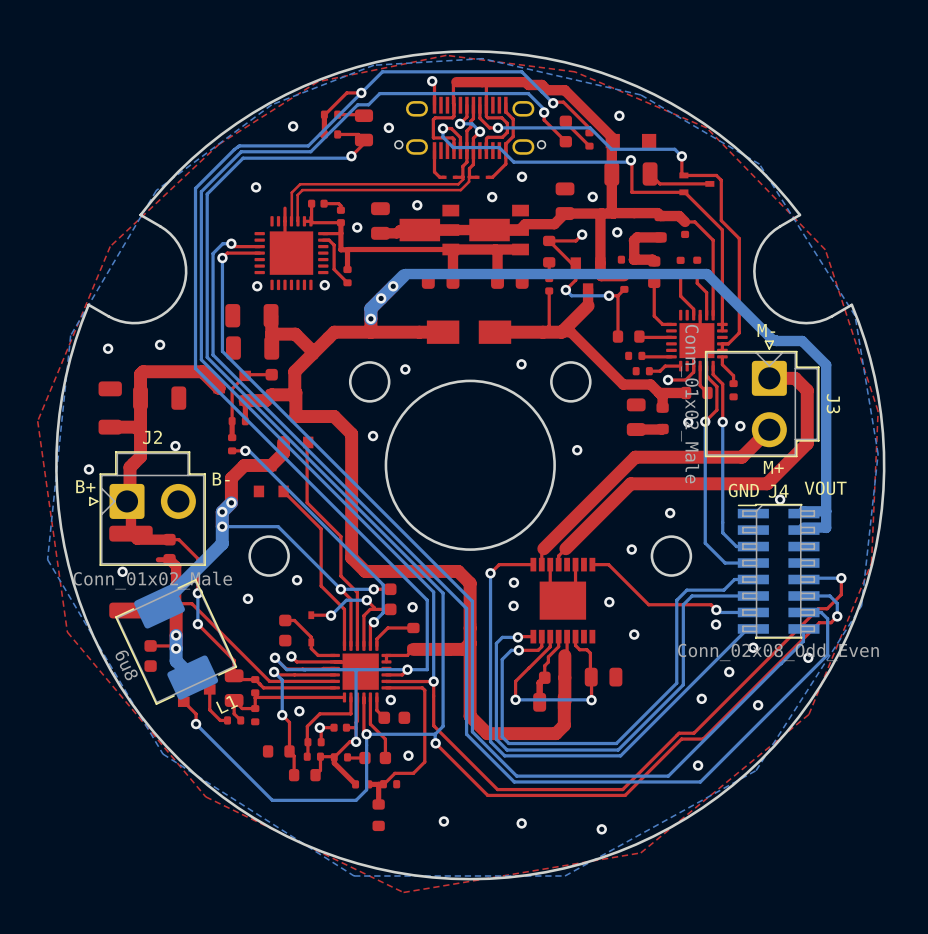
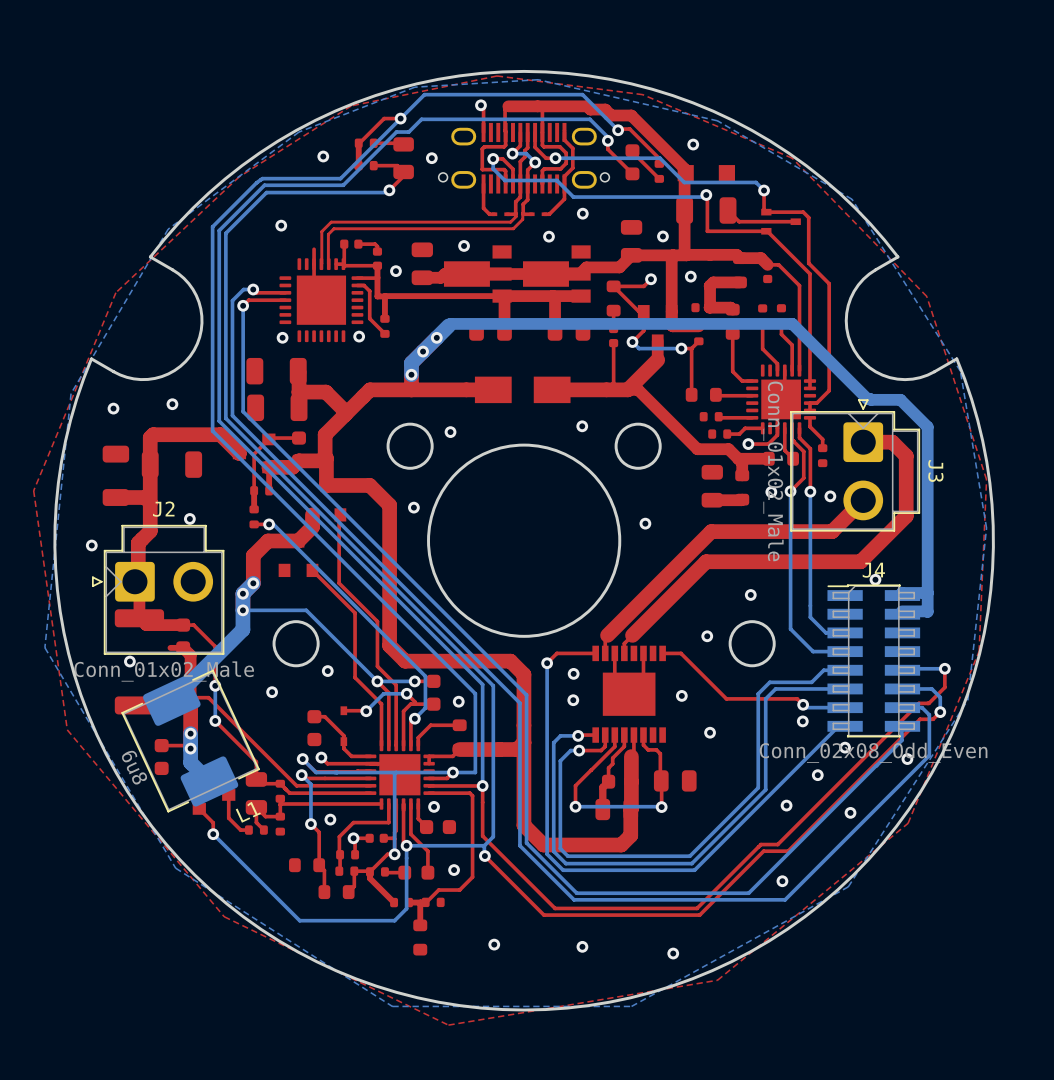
text: M- (766, 330) -> none
text: M+ (773, 467) -> none
text: B- (221, 479) -> none
text: B+ (85, 486) -> none
text: VOUT (825, 488) -> none
text: GND (743, 490) -> none

